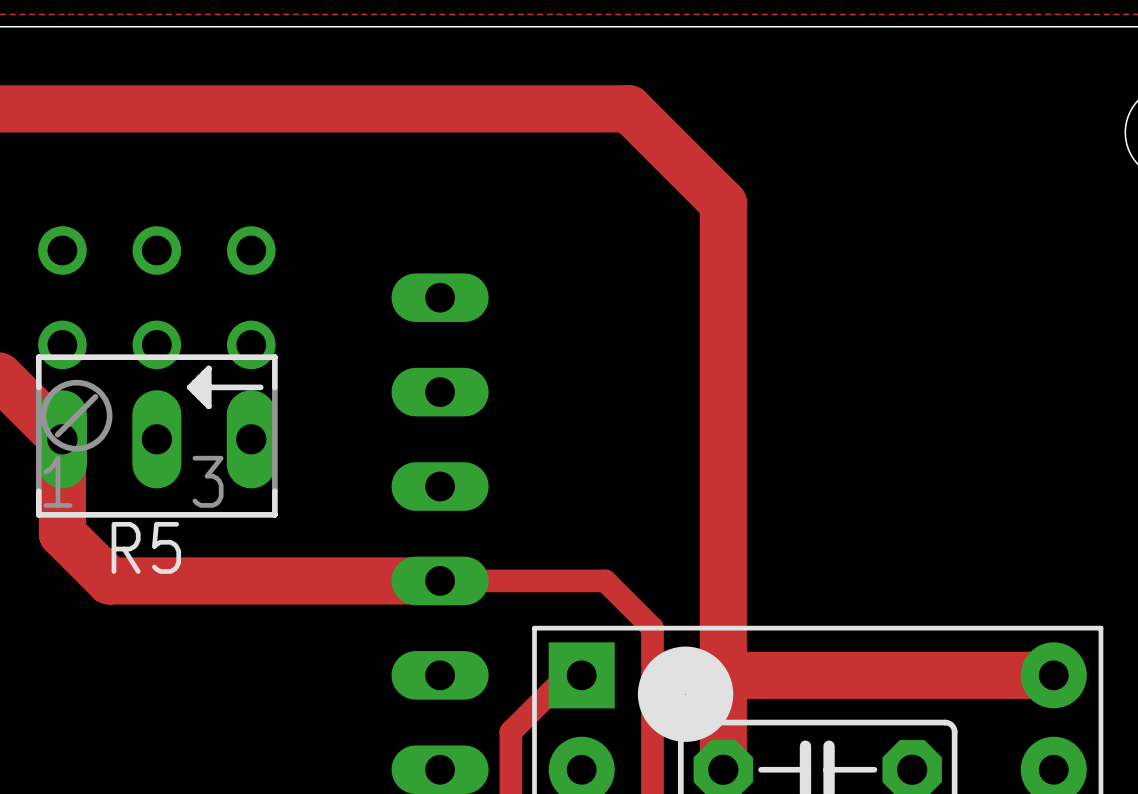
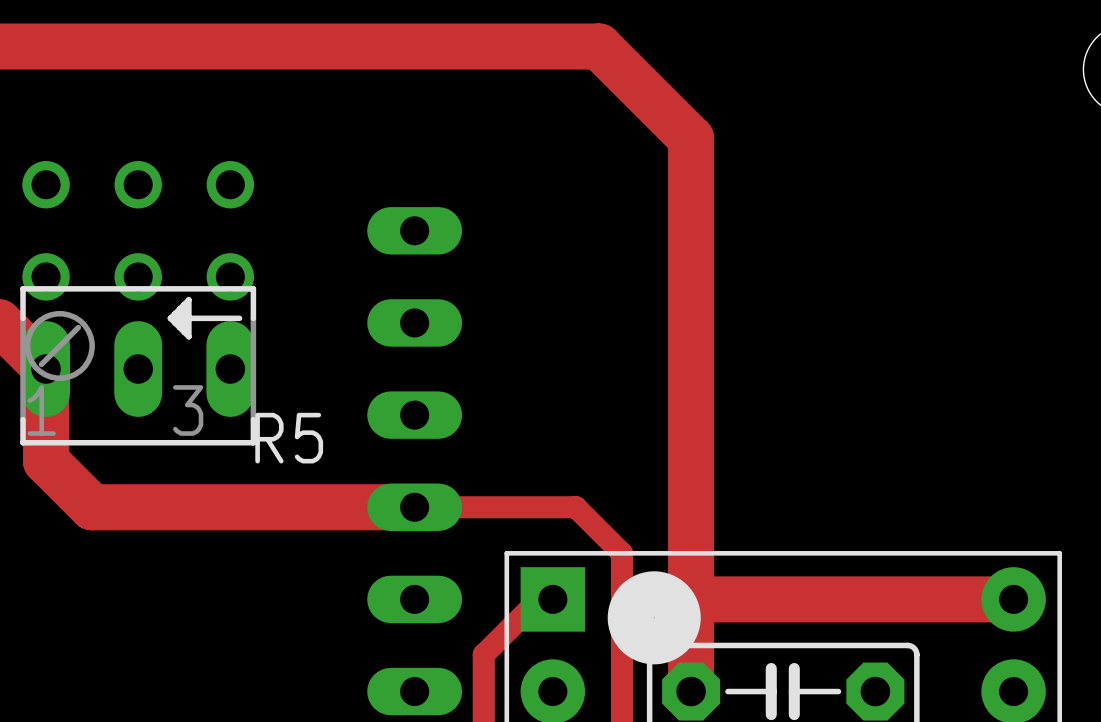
R5 name position: R5 (146, 547) -> R5 (289, 438)

